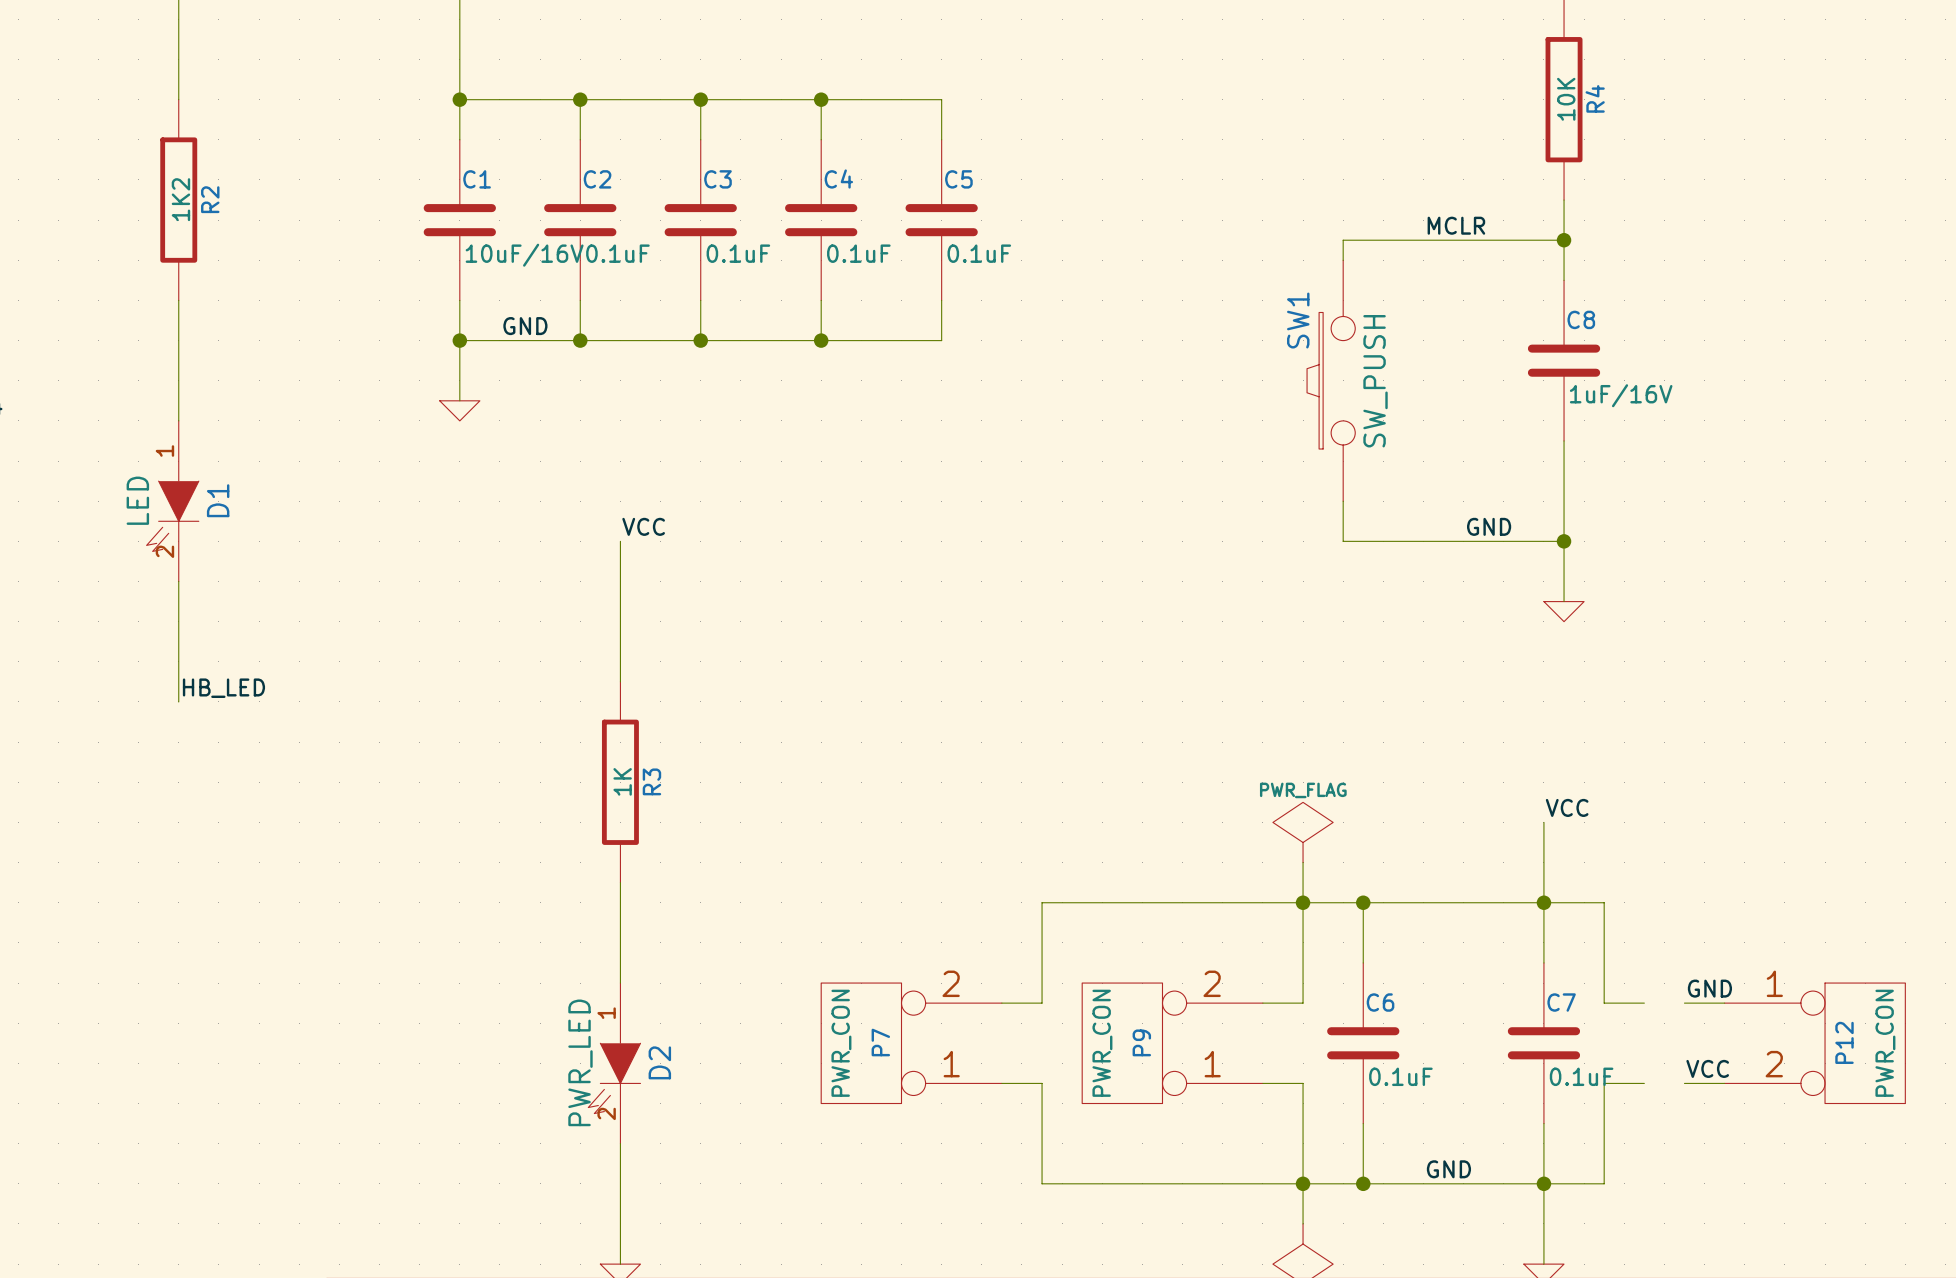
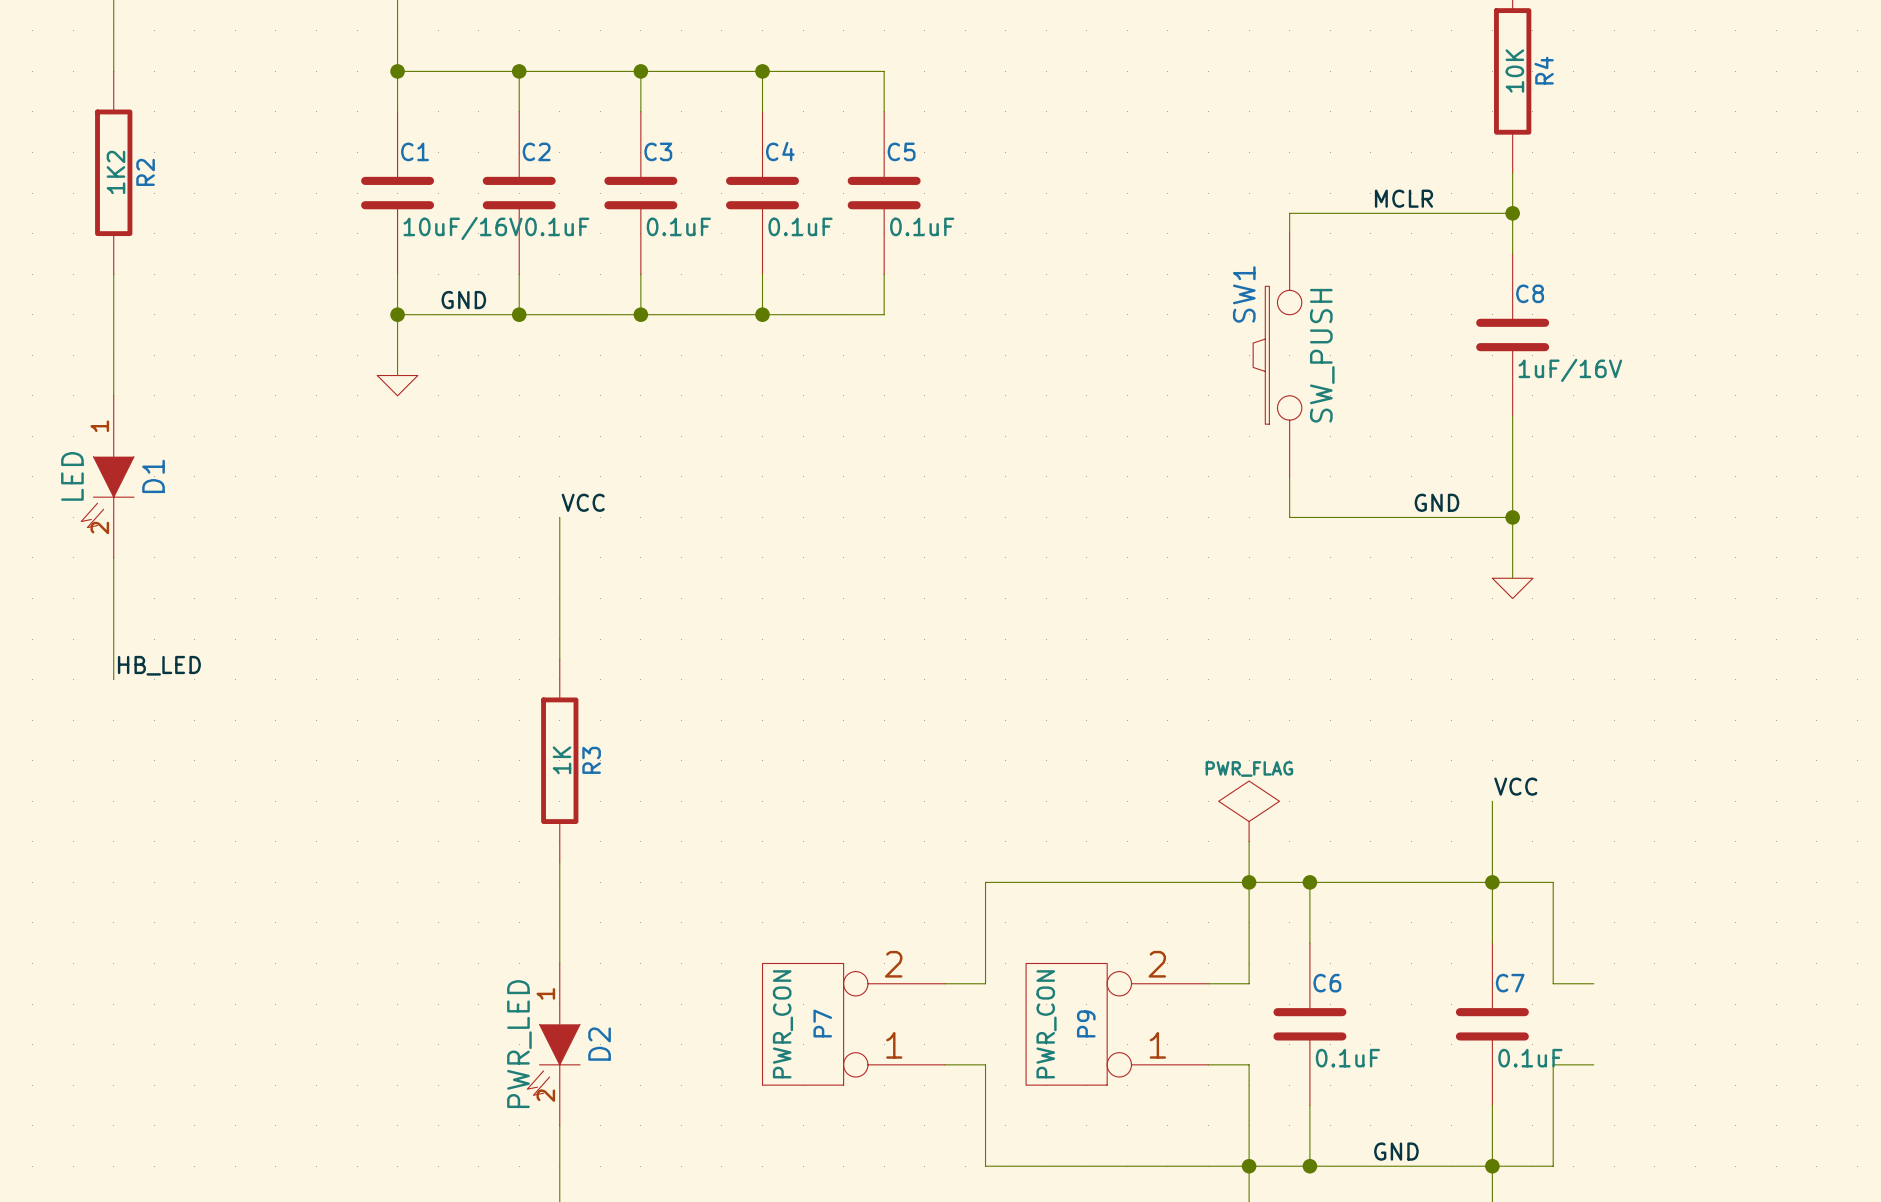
label: GND (1709, 988) -> none
wire: (1684, 1003) (1724, 1003) -> none
P12: PWR_CON (1814, 1043) -> none
label: VCC (1707, 1068) -> none
wire: (1684, 1083) (1724, 1083) -> none

